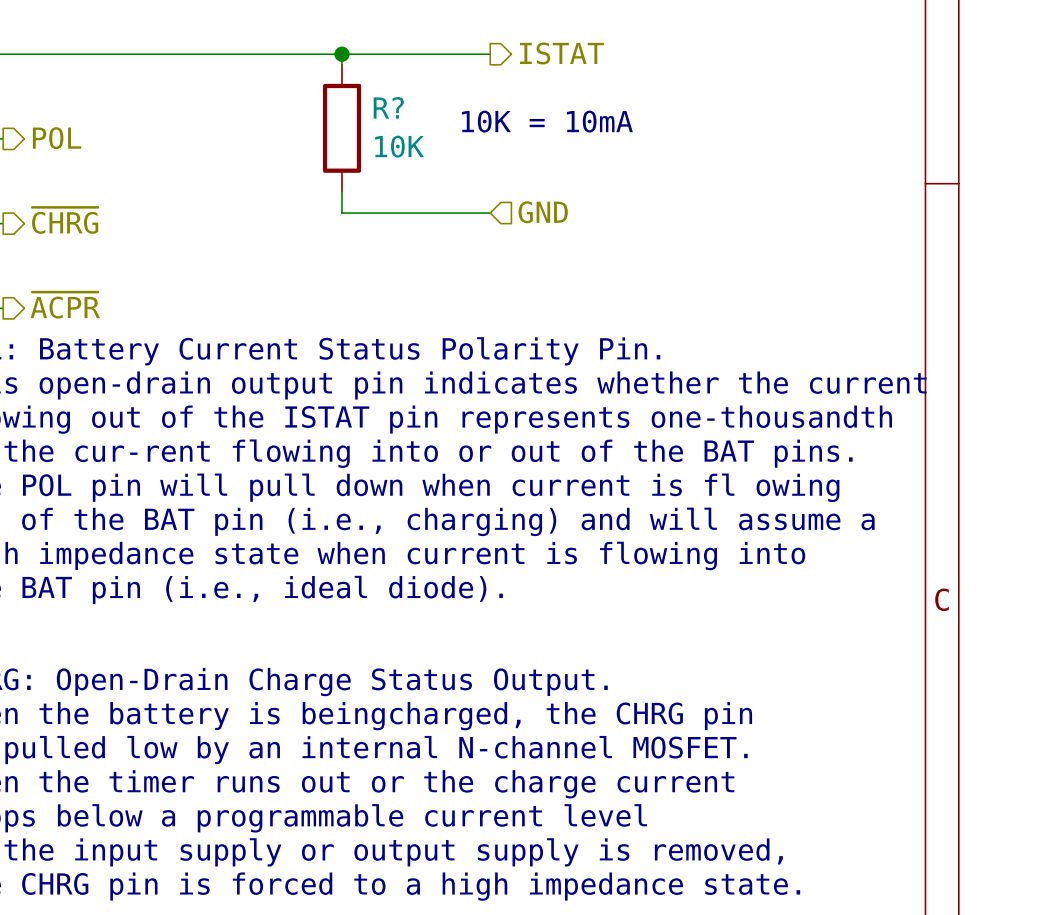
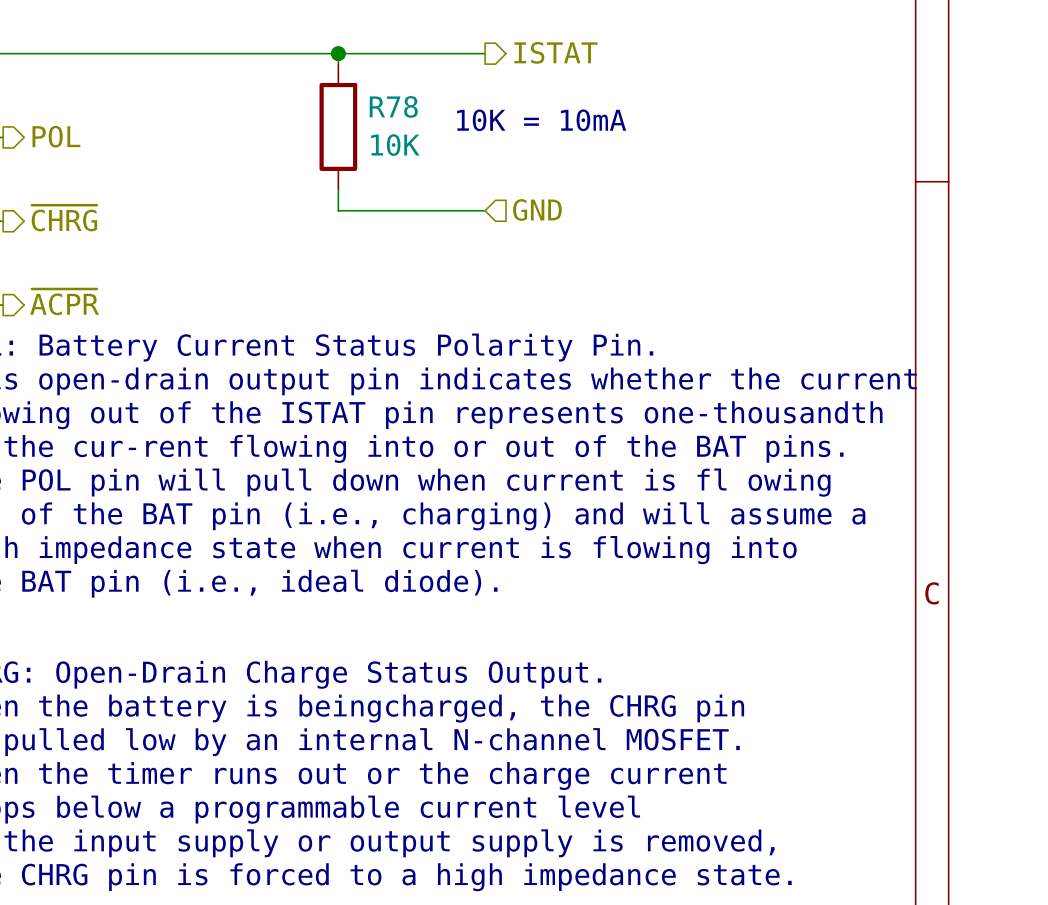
R? name: R? (388, 107) -> R78 (393, 106)

